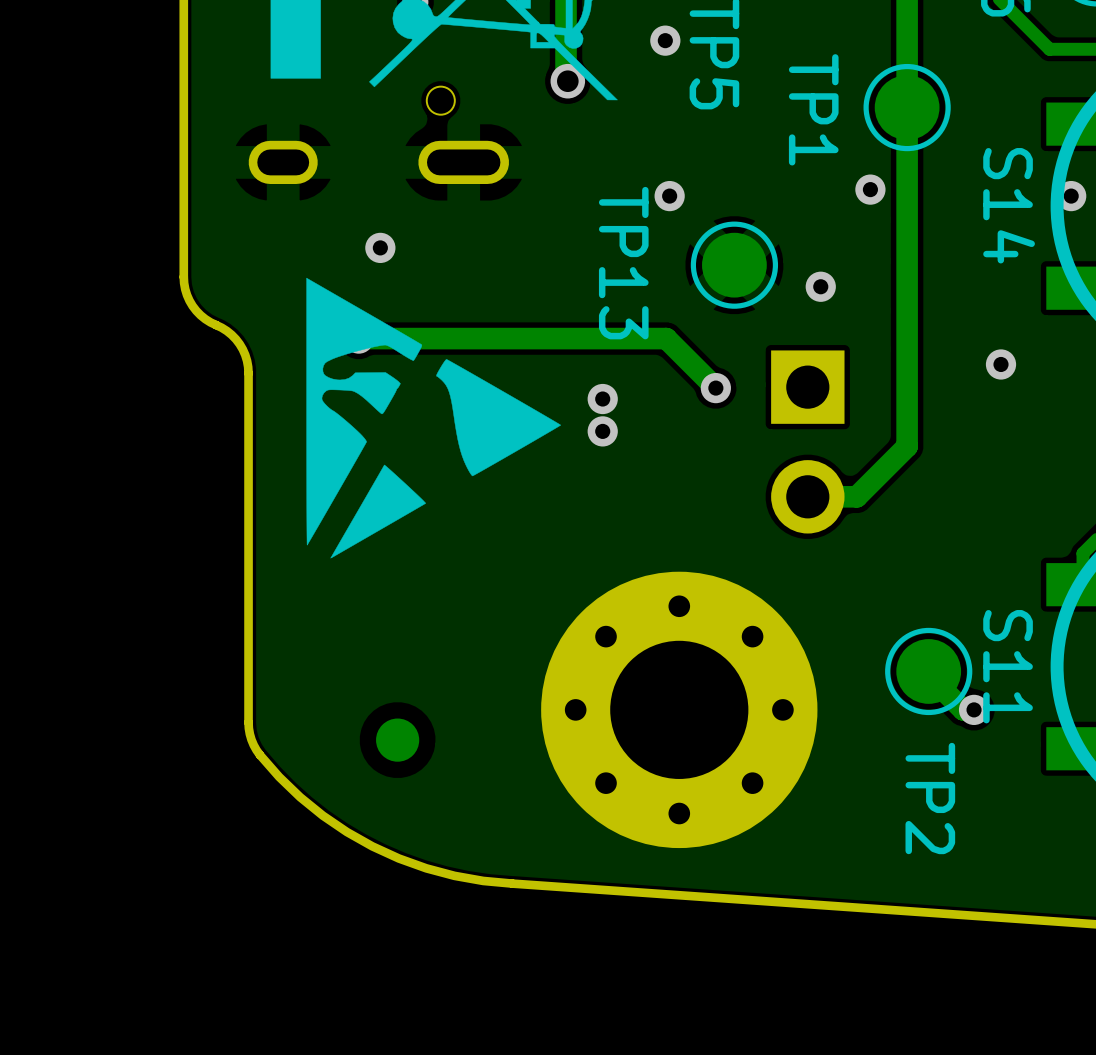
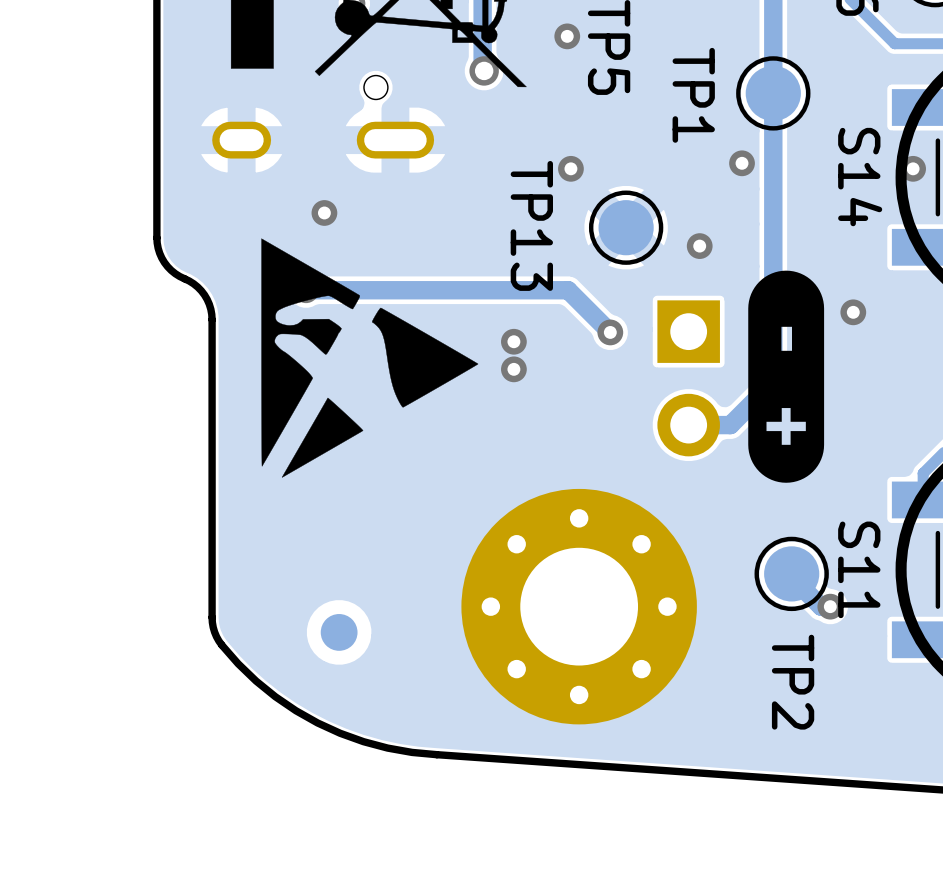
drawing: none -> [748, 270, 825, 483]

